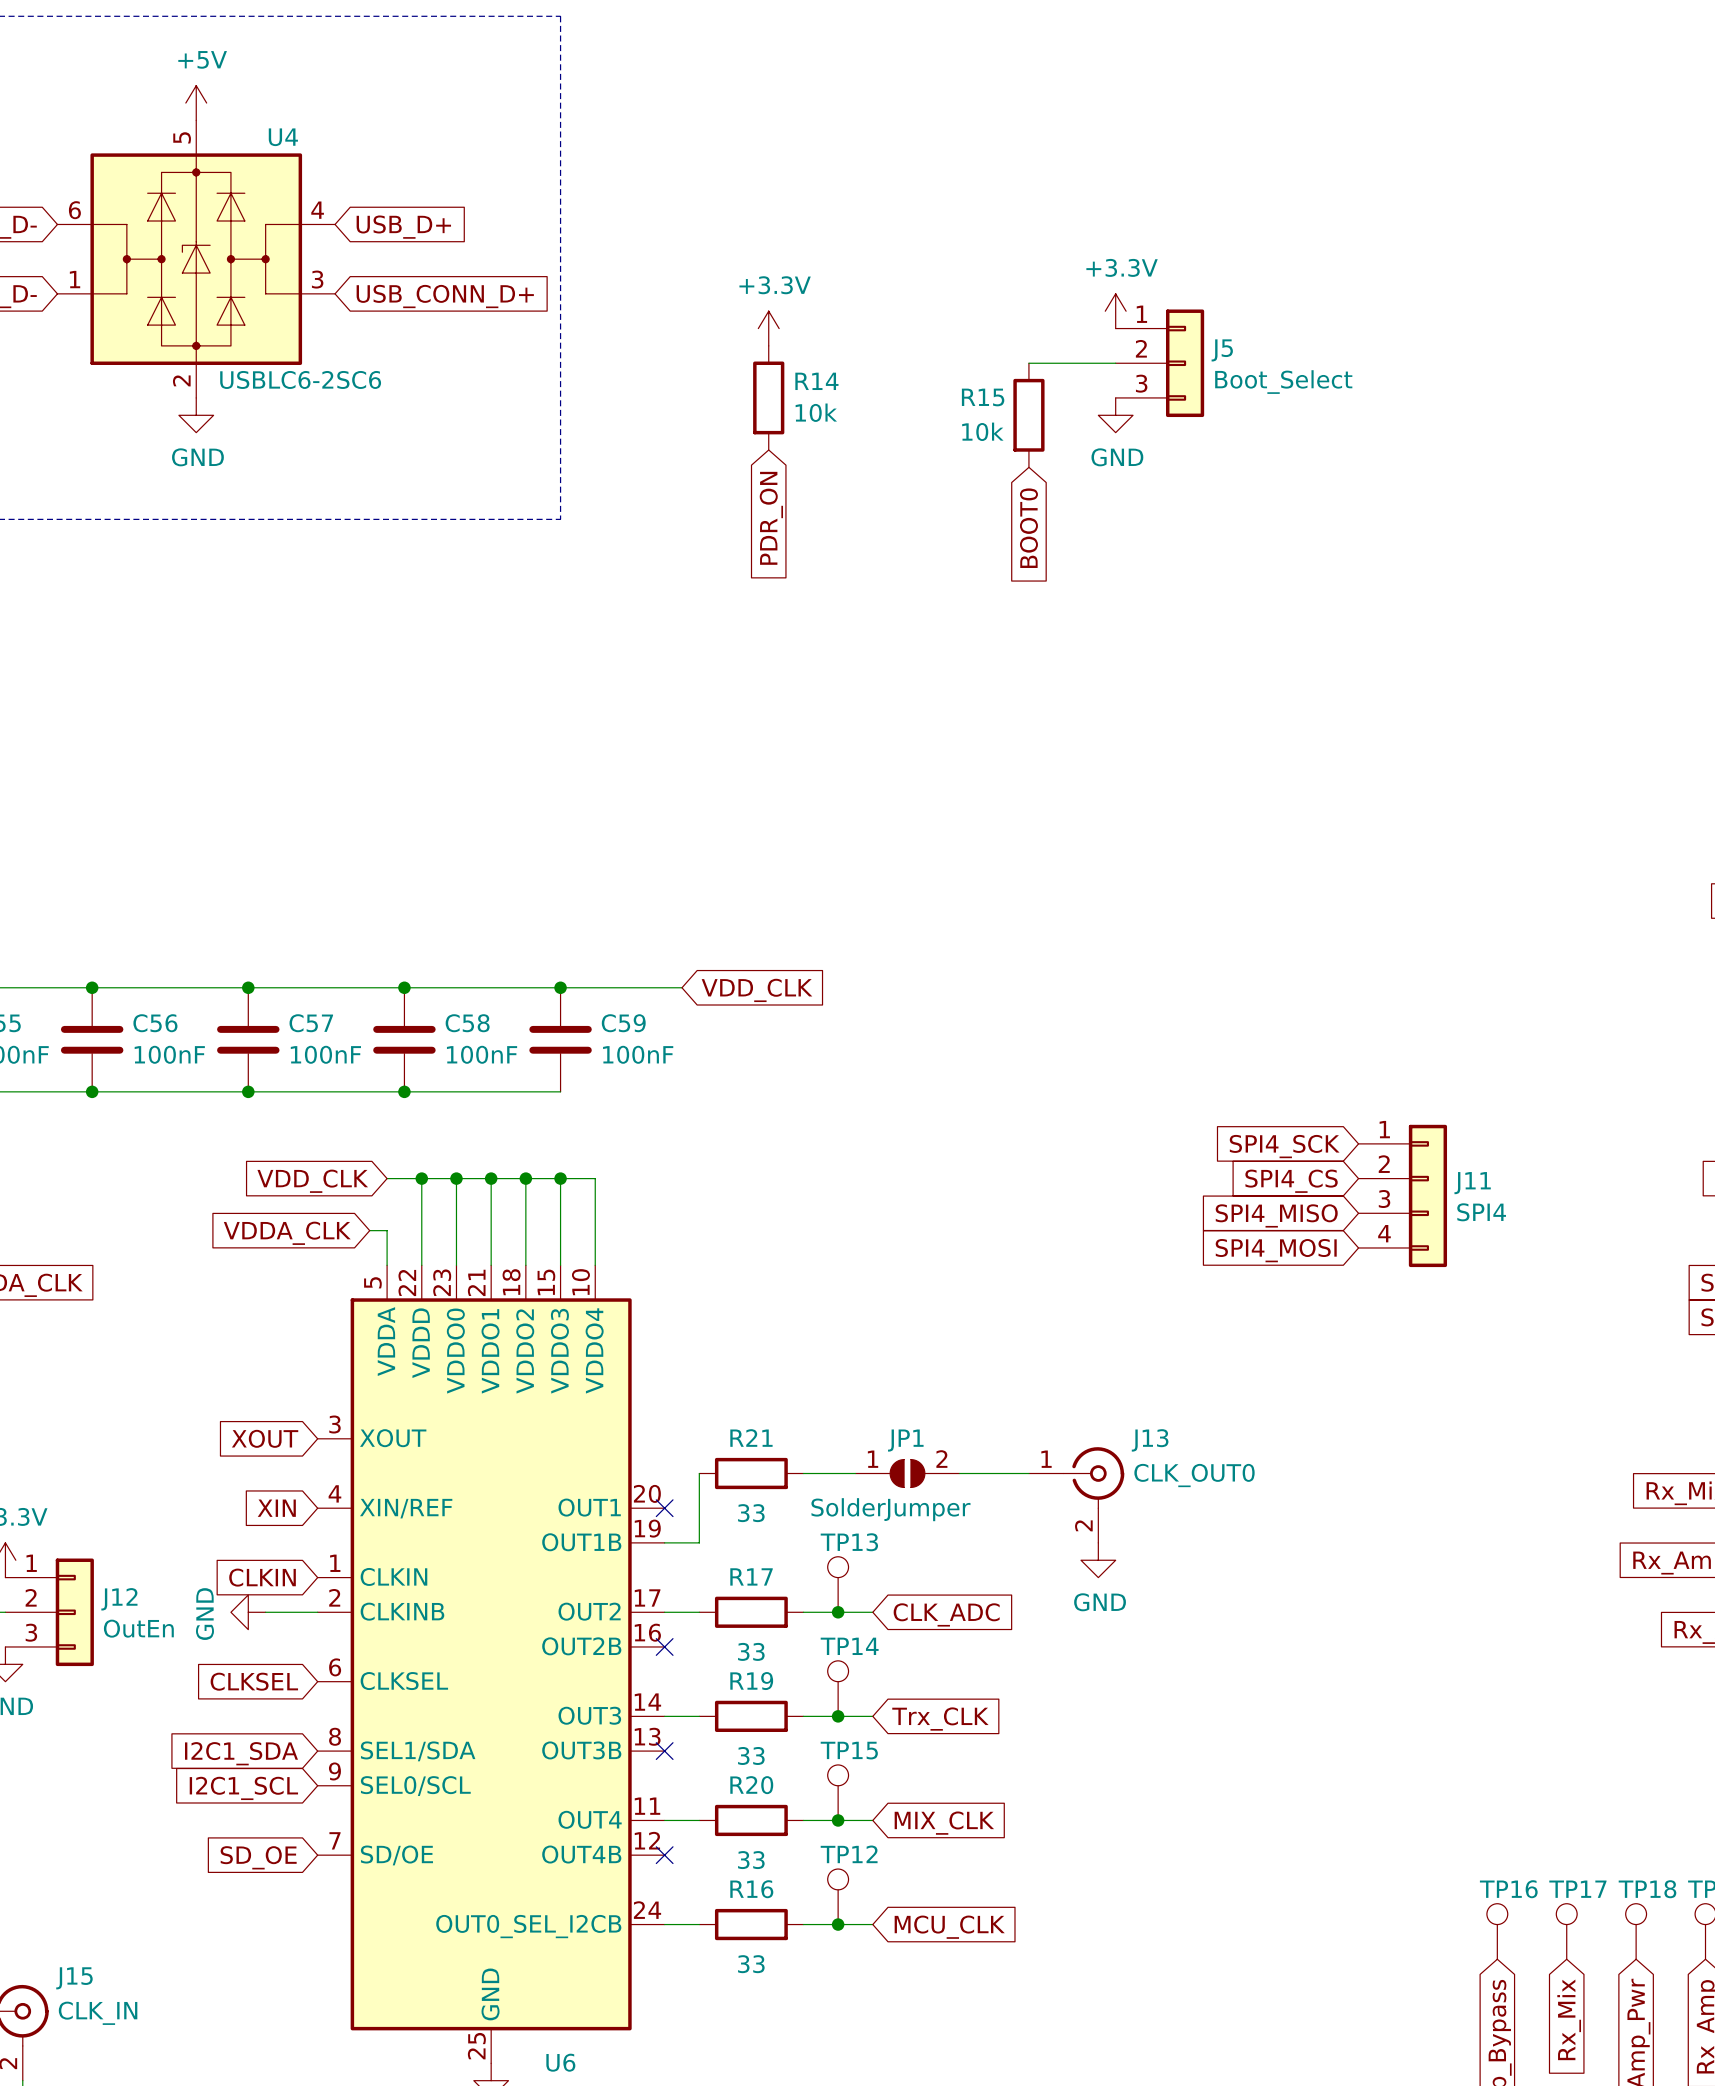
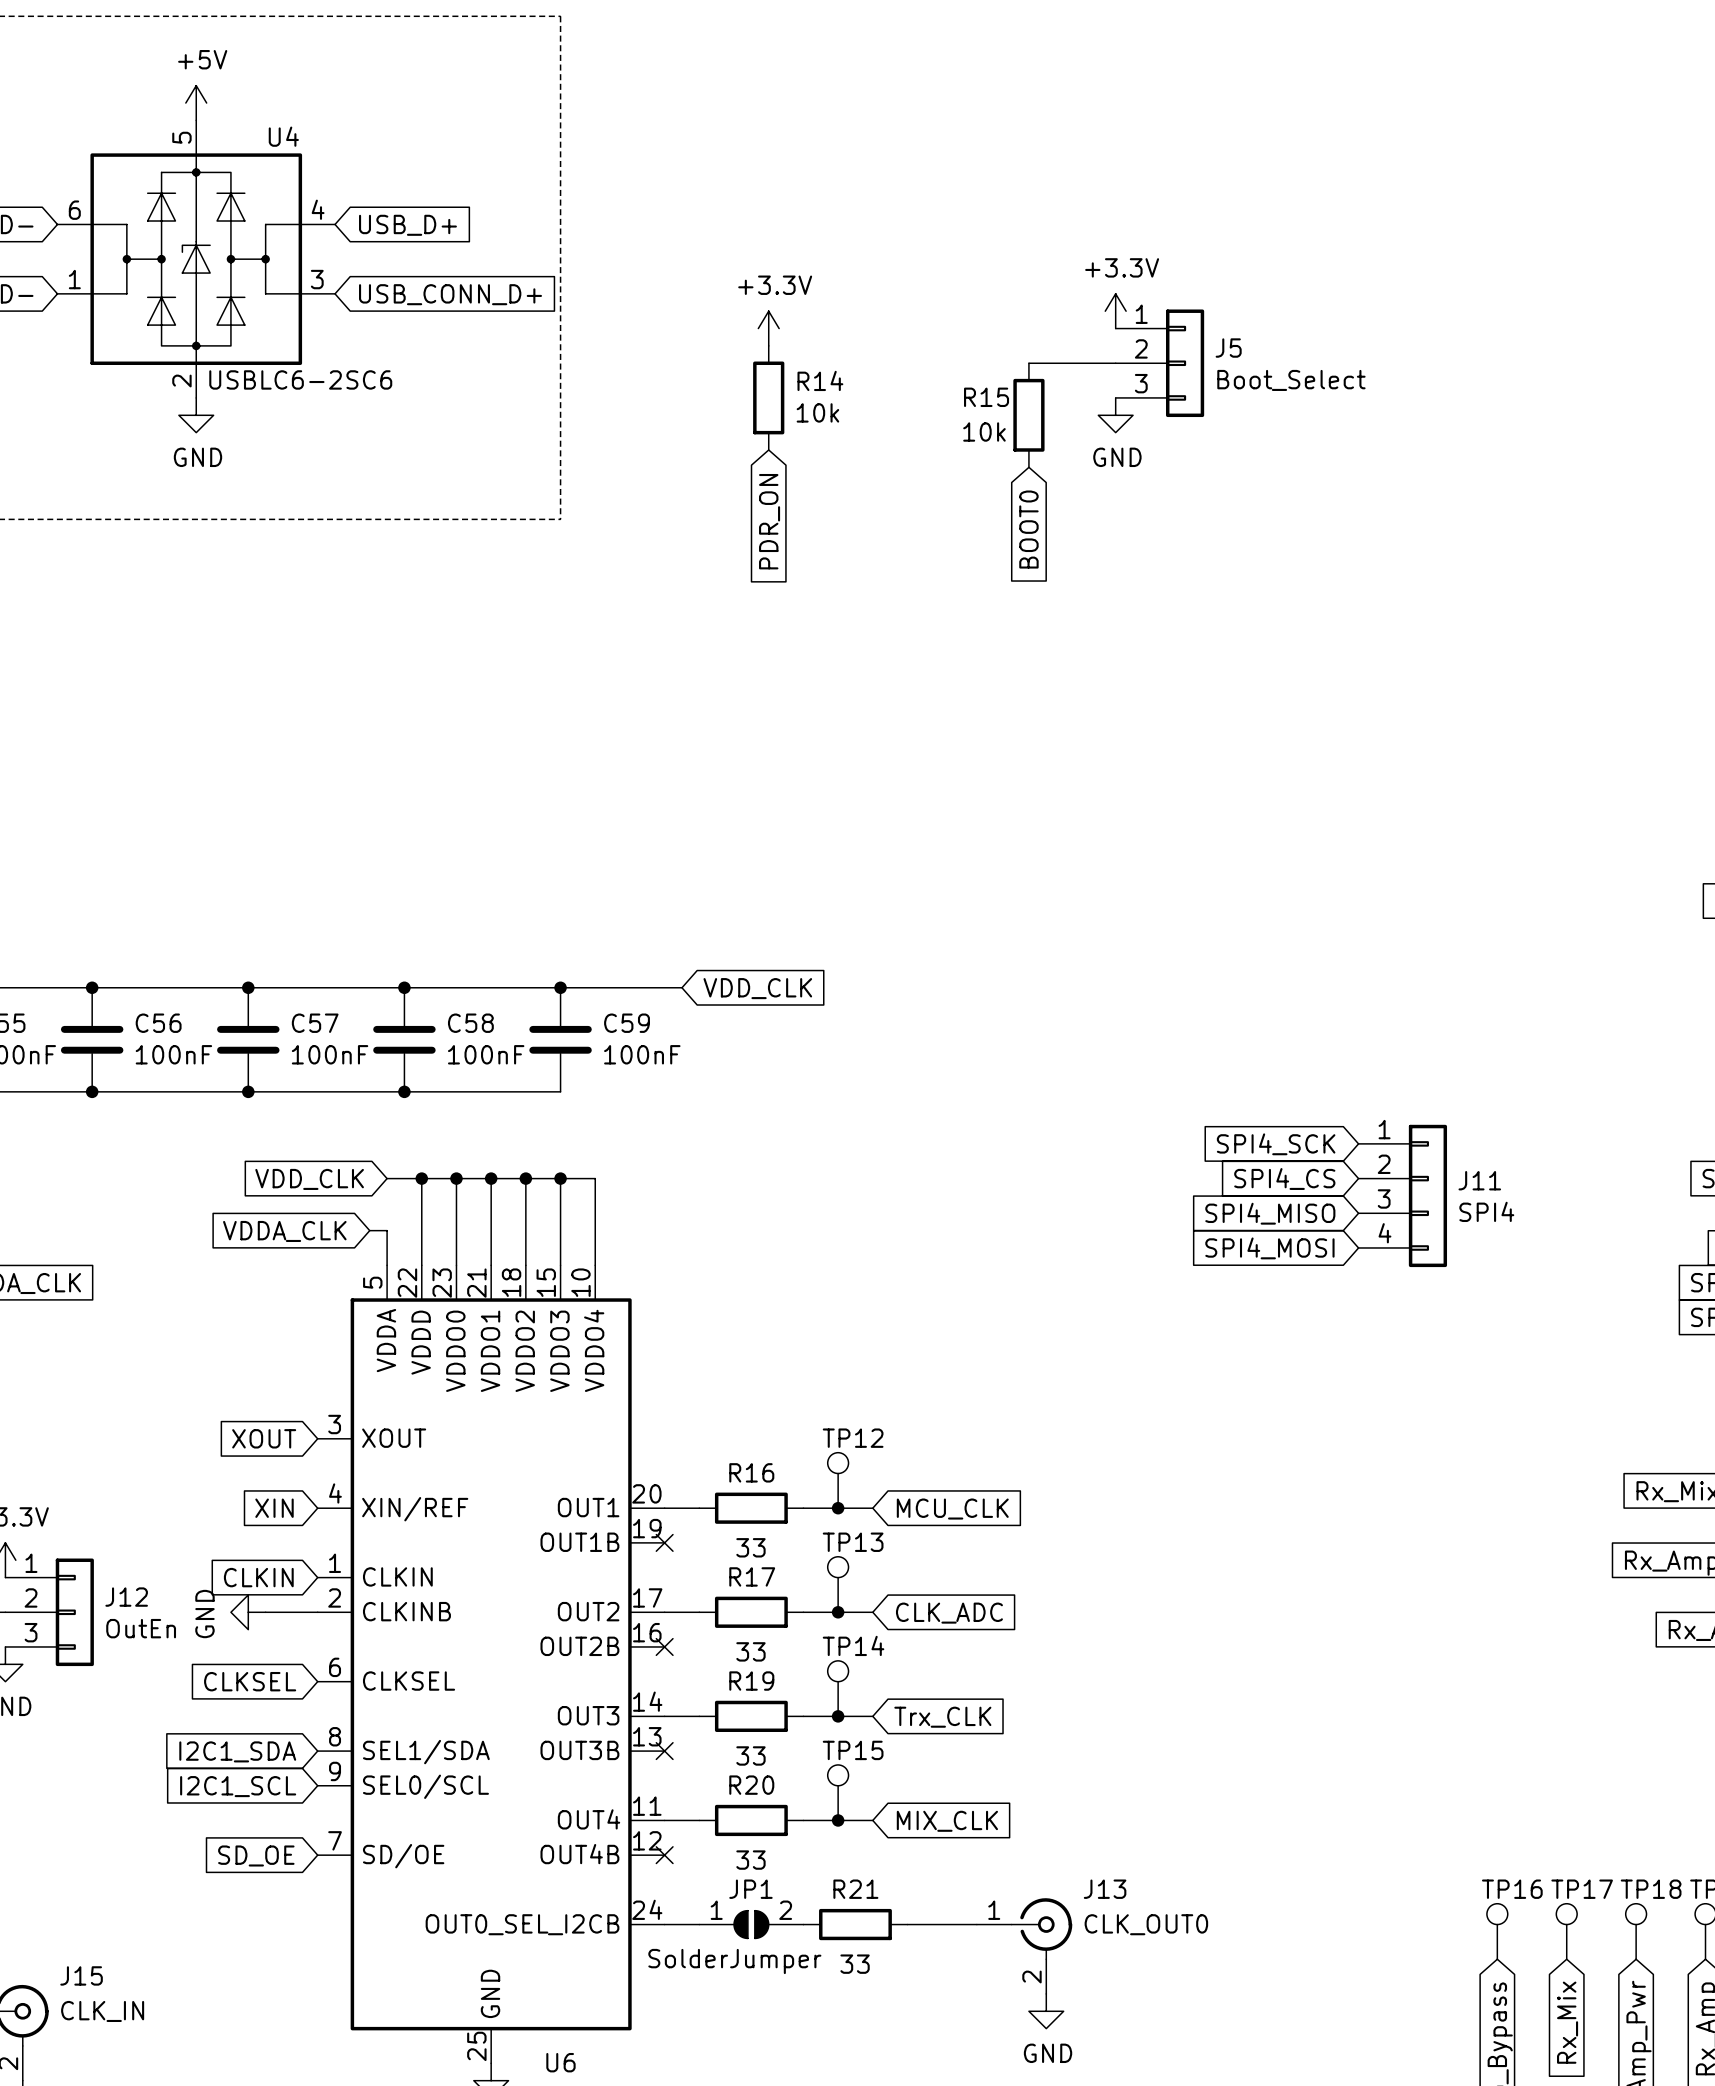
wire: (699, 1473) (699, 1542) (664, 1542) -> none
R21 position: (751, 1473) -> (855, 1924)
wire: (803, 1473) (855, 1473) -> none
JP1 position: (907, 1473) -> (751, 1924)
wire: (959, 1473) (1028, 1473) -> (803, 1508) (872, 1508)
J13 position: (1076, 1495) -> (1024, 1946)
wire: none -> (664, 1508) (699, 1508)
no-connect mark position: (664, 1508) -> (664, 1542)
junction: none -> (838, 1508)
global label: none -> MCU_CLK (952, 1509)
power symbol: GND (1098, 1560) -> none
TP12 position: (838, 1896) -> (838, 1480)
R16 position: (751, 1924) -> (751, 1508)
wire: (803, 1924) (872, 1924) -> (907, 1924) (976, 1924)
junction: (838, 1924) -> none
global label: MCU_CLK (949, 1927) -> none
power symbol: none -> GND (1046, 2011)

